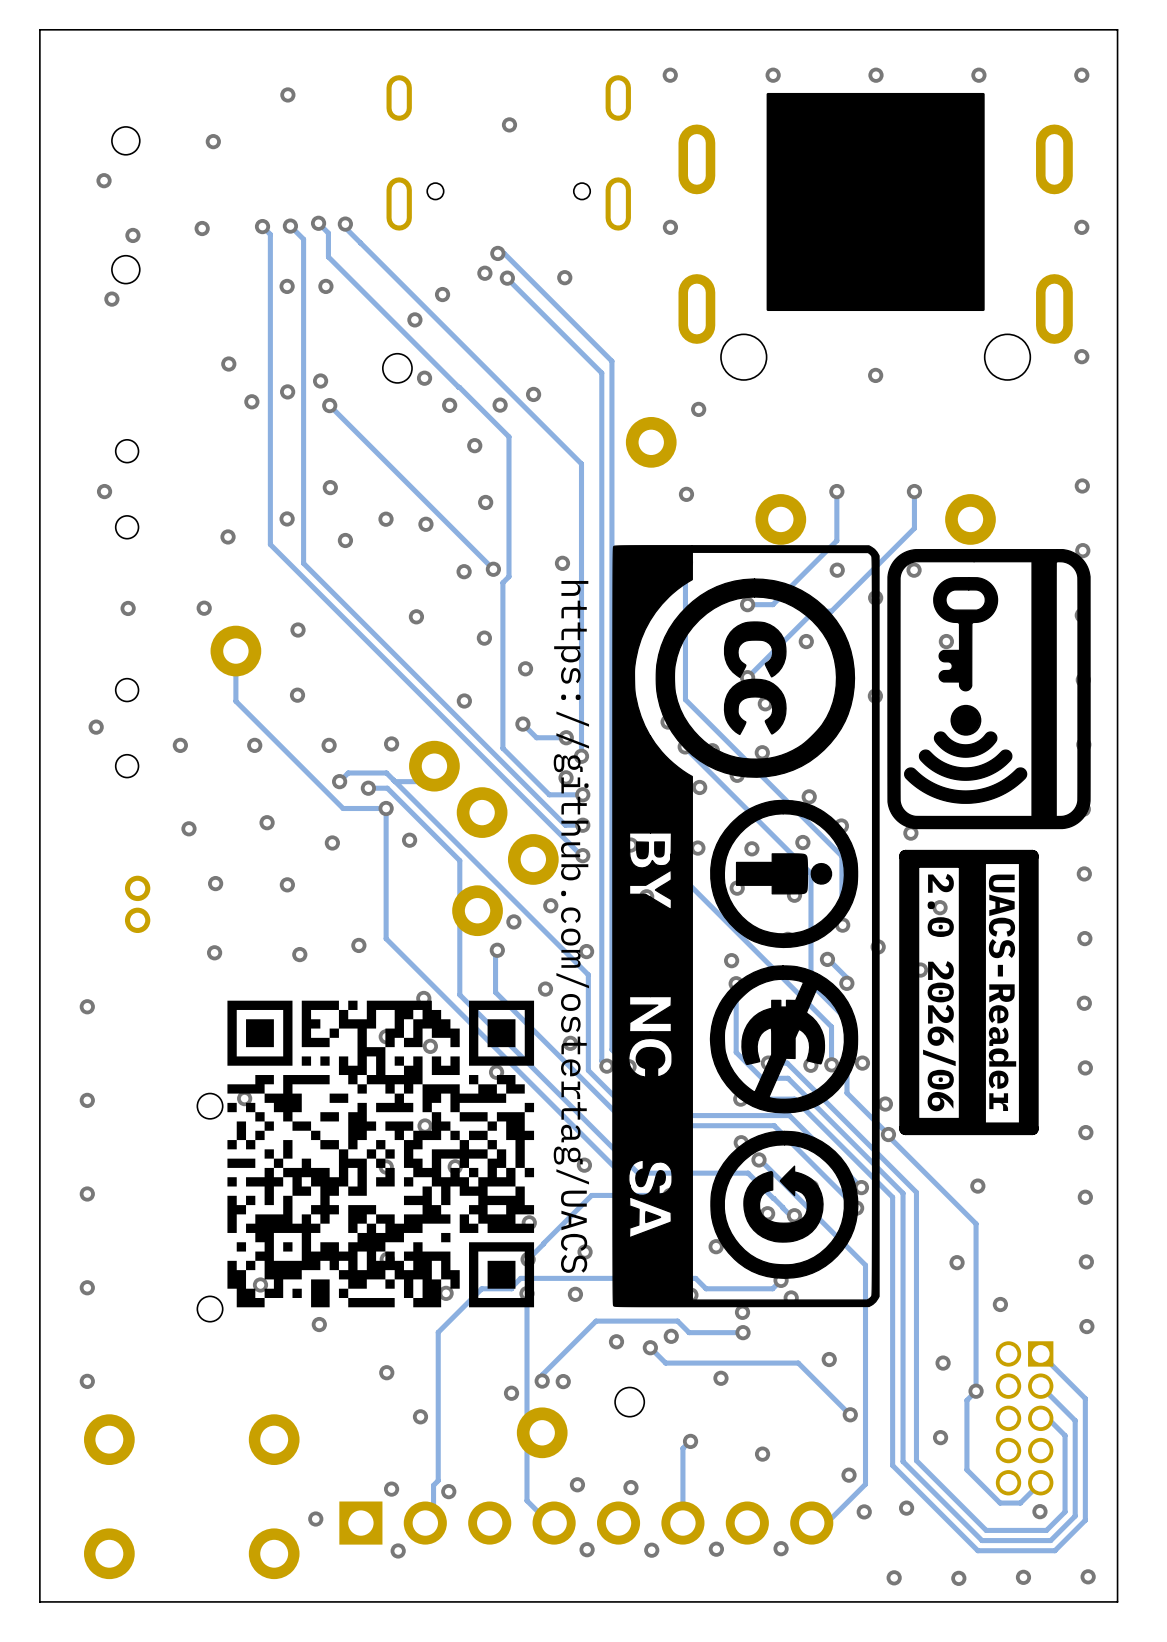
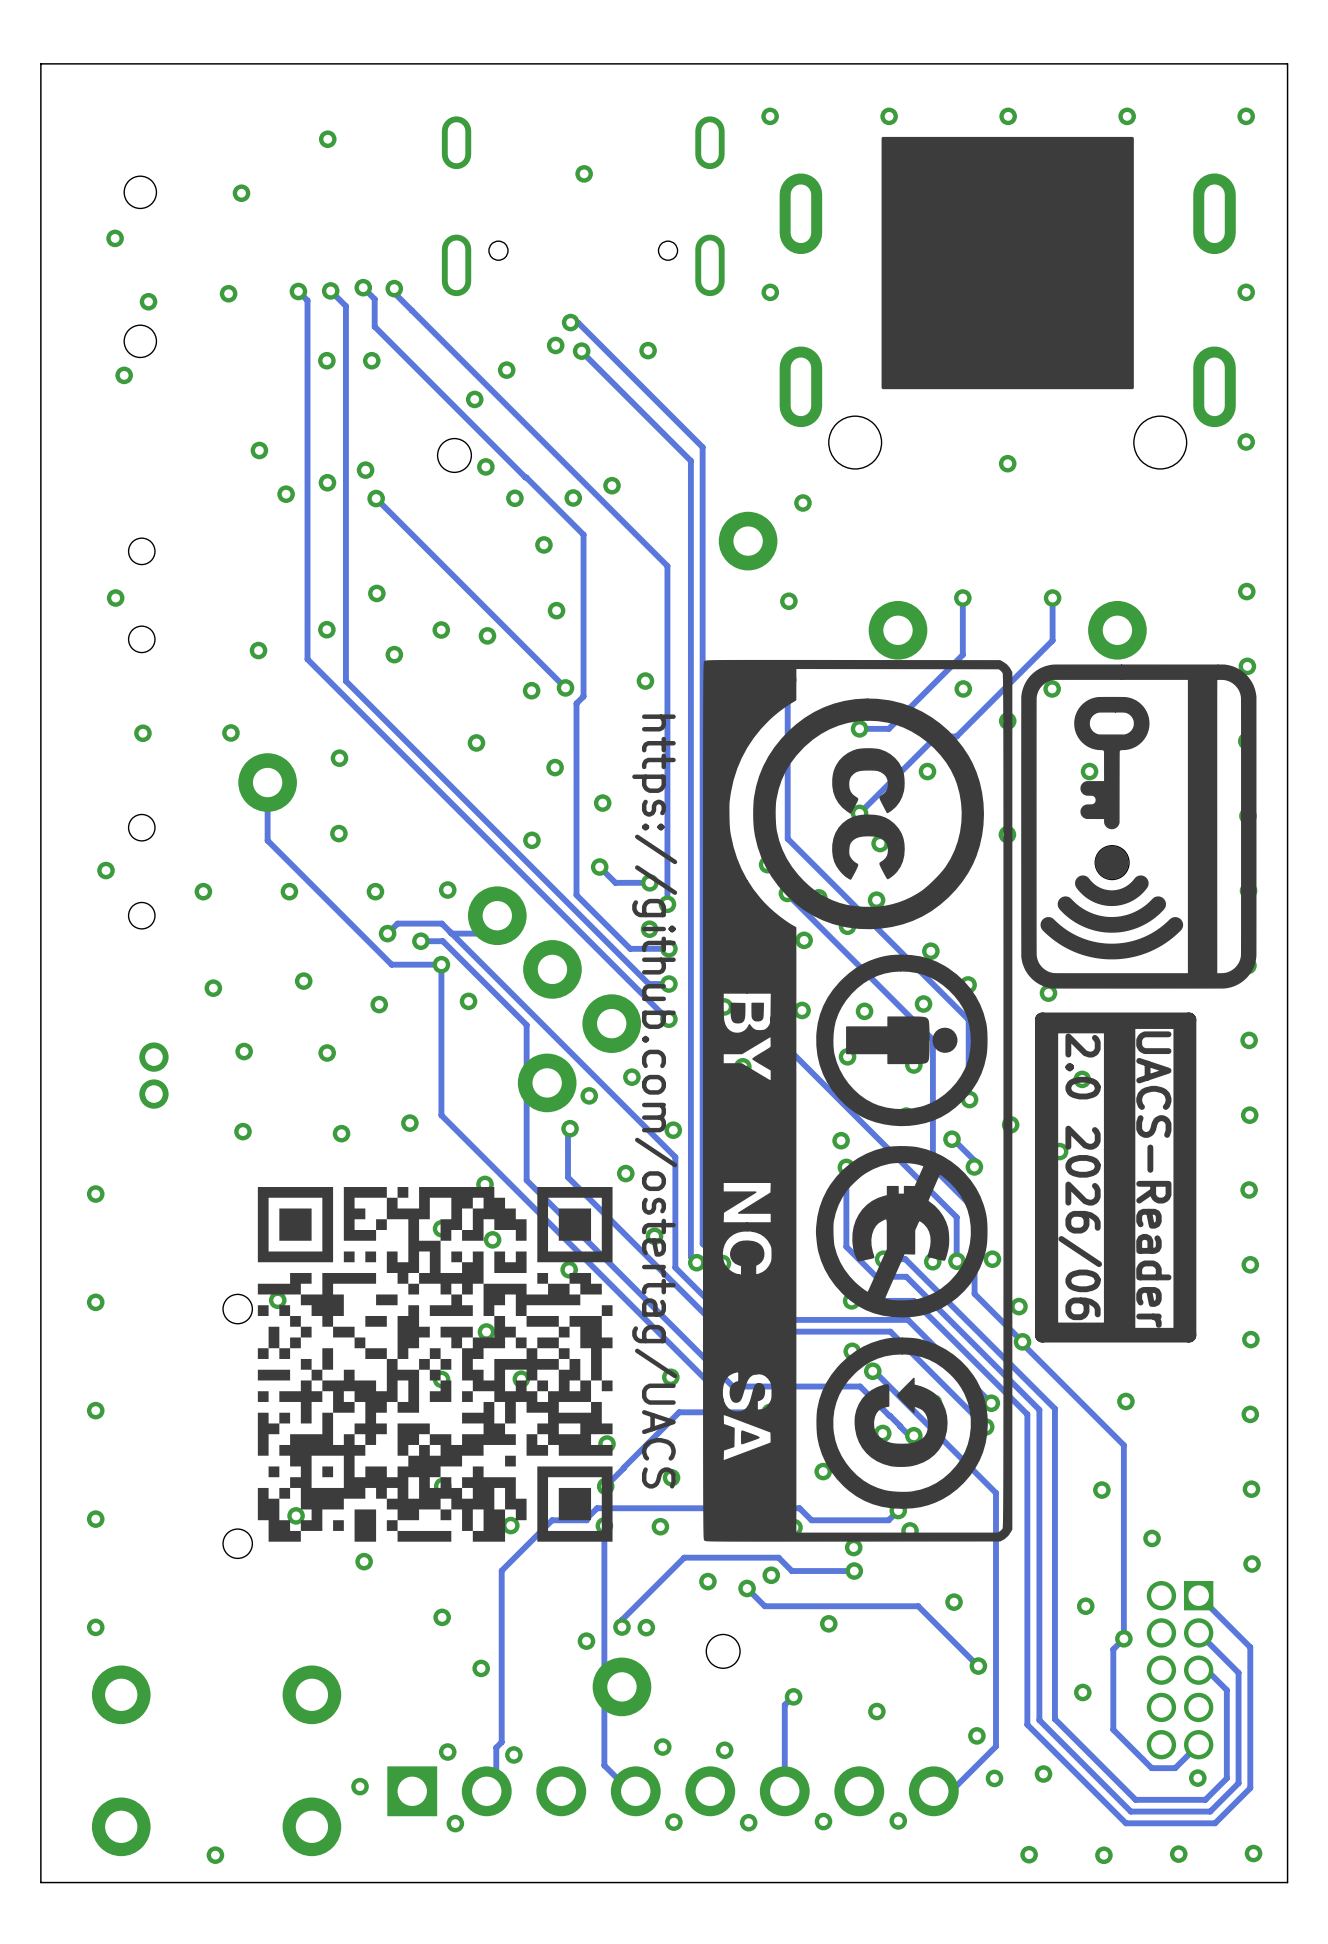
via: none -> (215, 1855)

